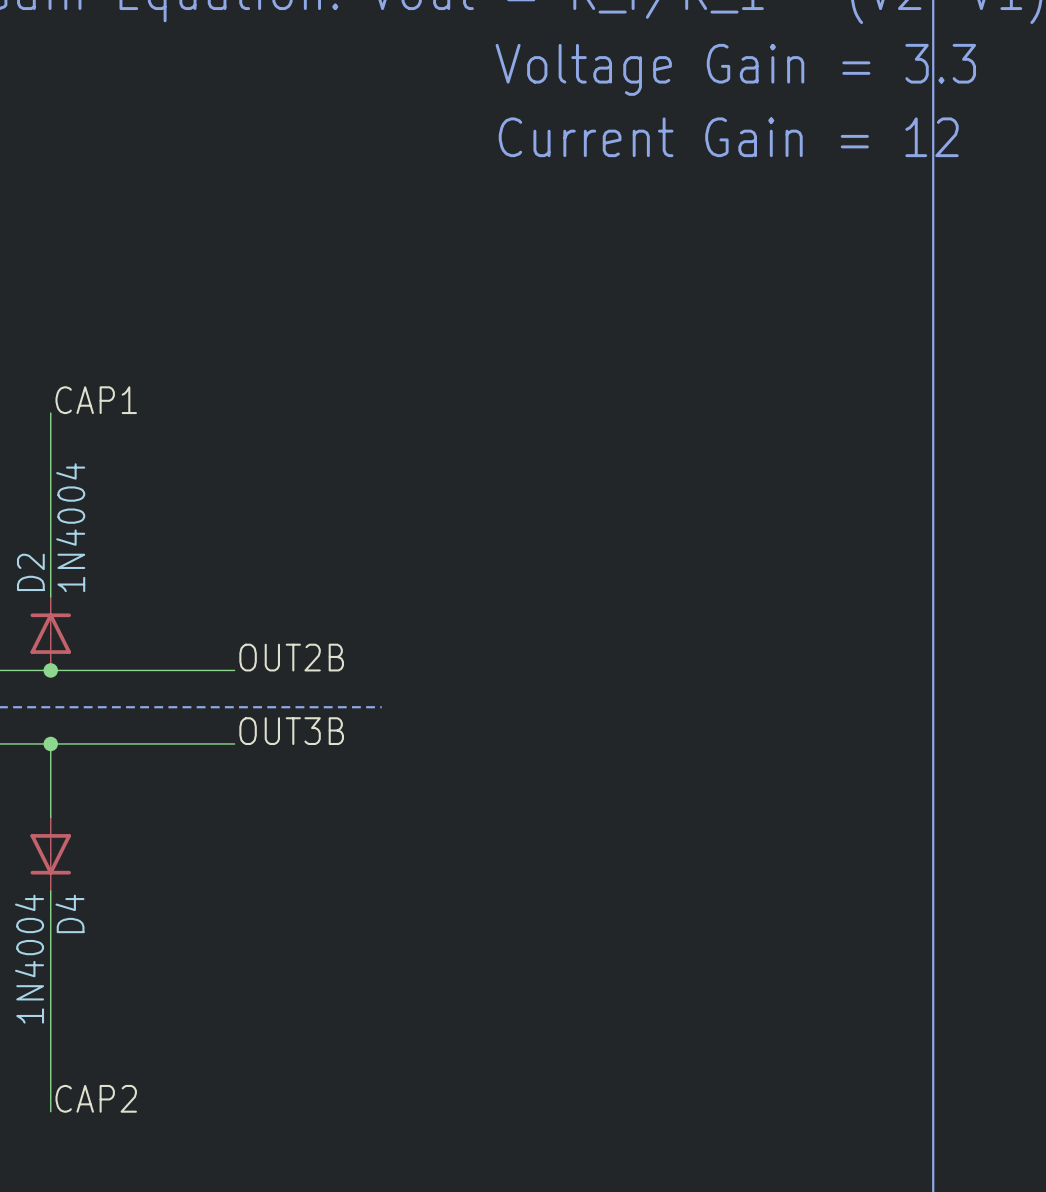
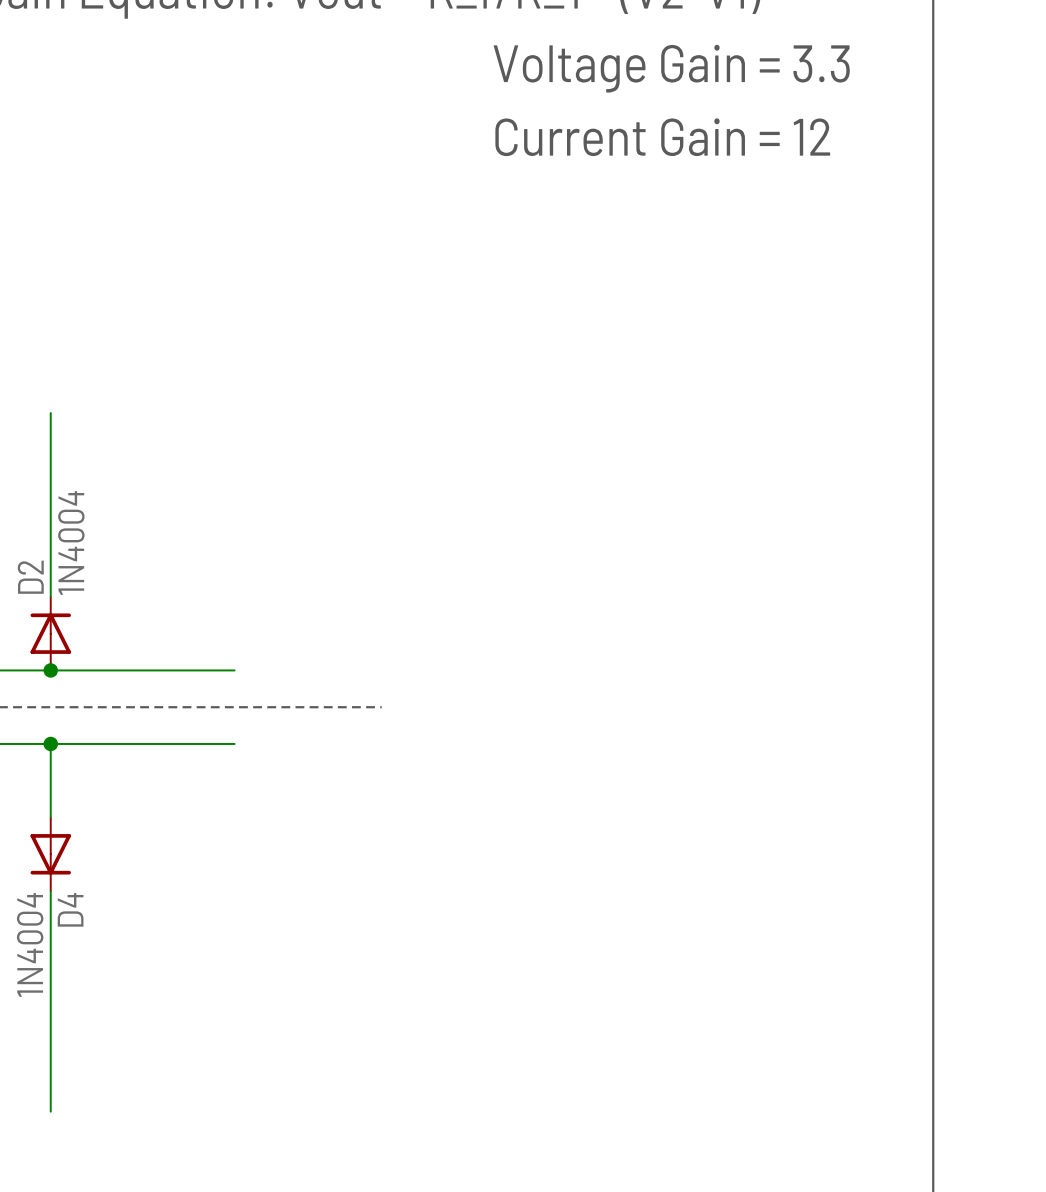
label: CAP1 (96, 400) -> none
label: OUT2B (291, 657) -> none
label: OUT3B (291, 731) -> none
label: CAP2 (96, 1098) -> none

